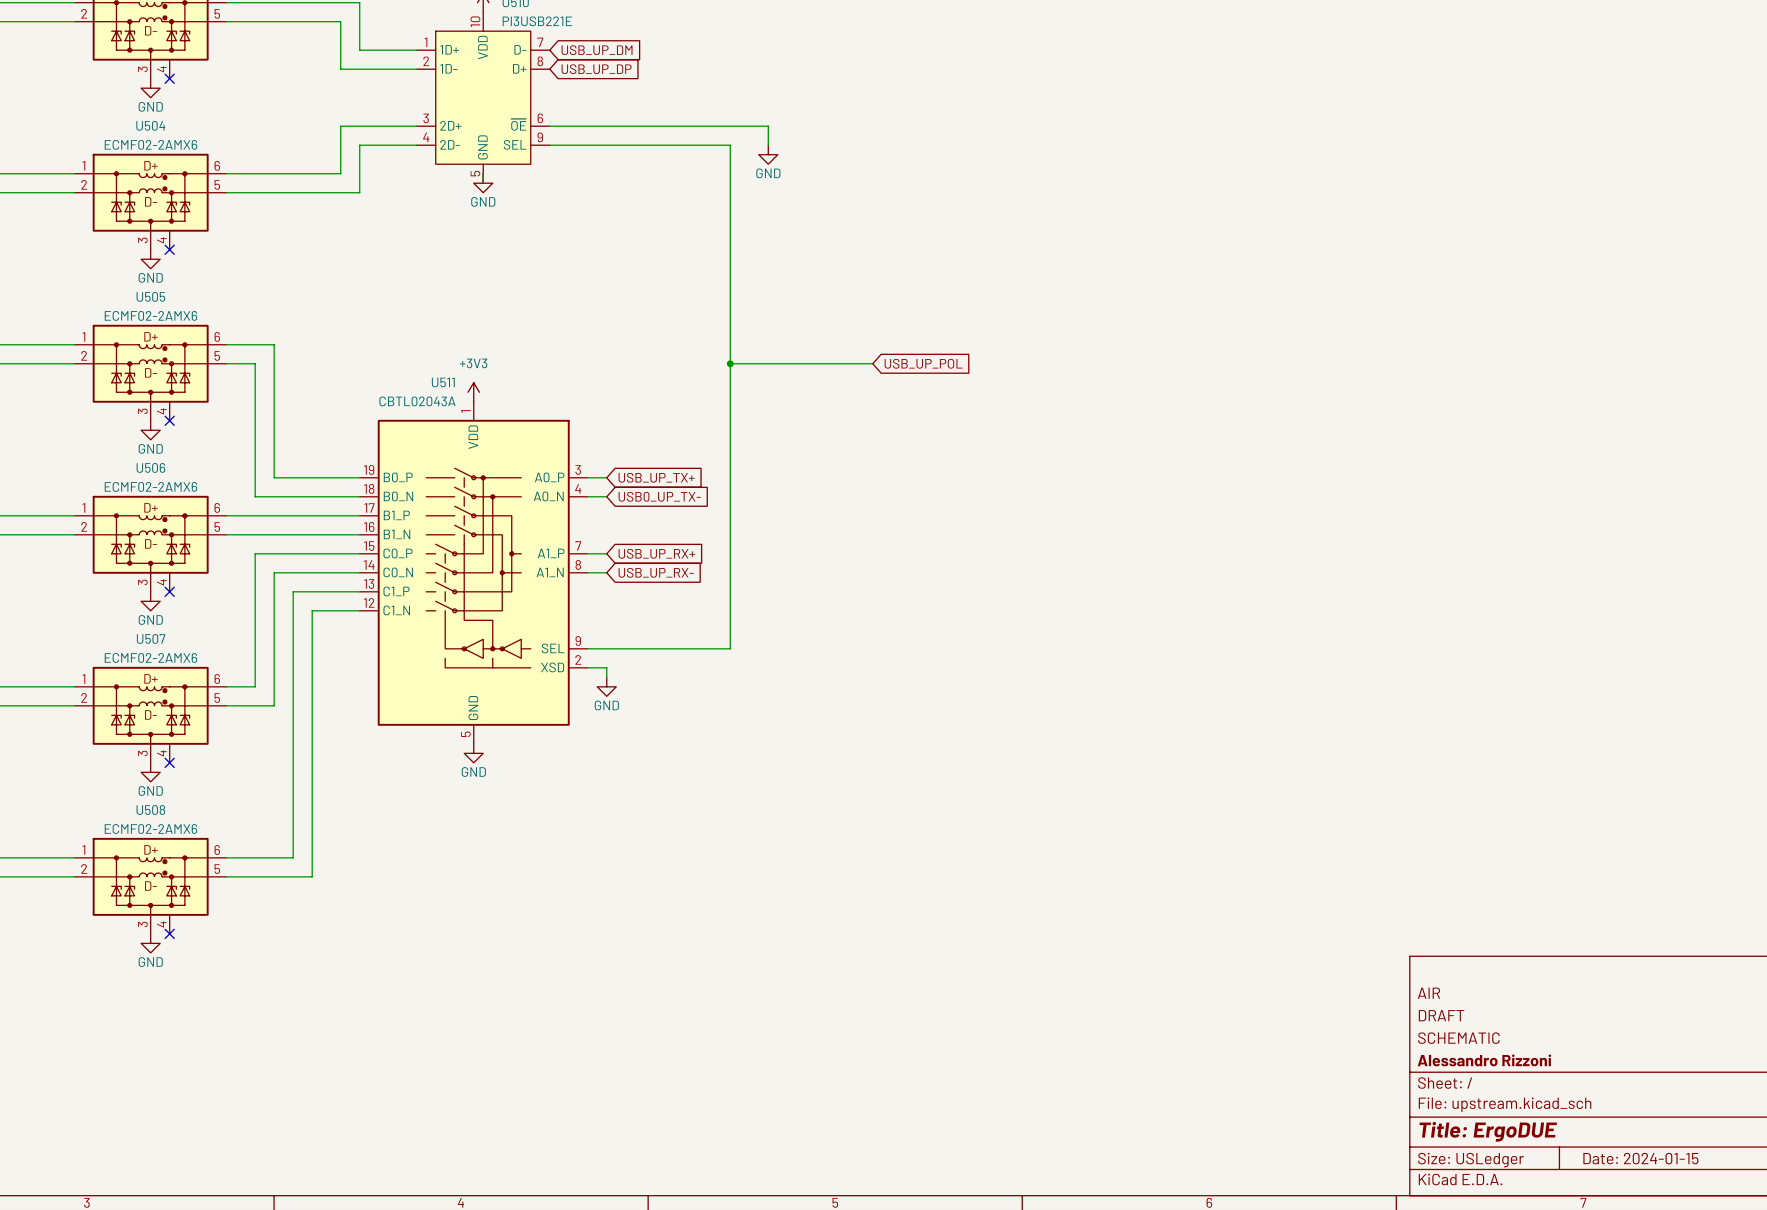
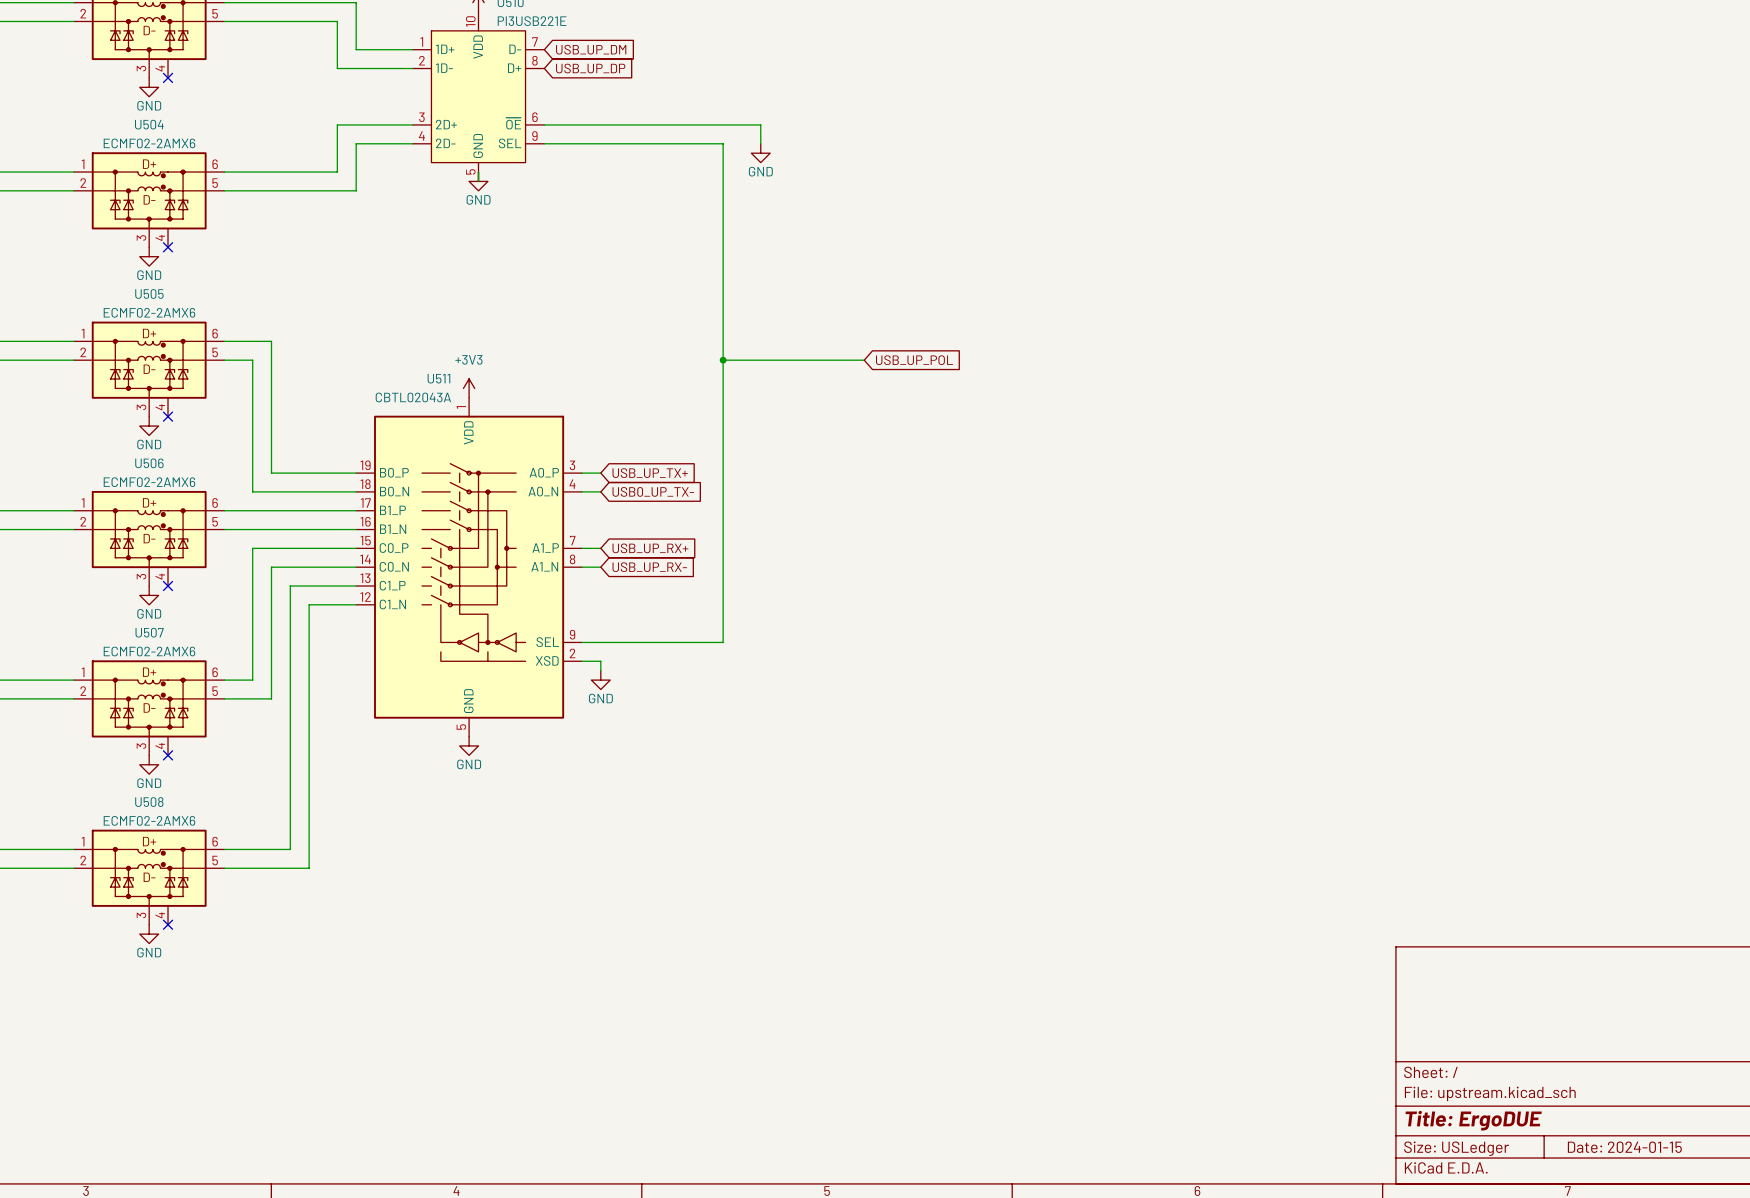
title block: AIR (1429, 993) -> none
title block: DRAFT (1441, 1015) -> none
title block: SCHEMATIC (1458, 1038) -> none
title block: Alessandro Rizzoni (1484, 1060) -> none

